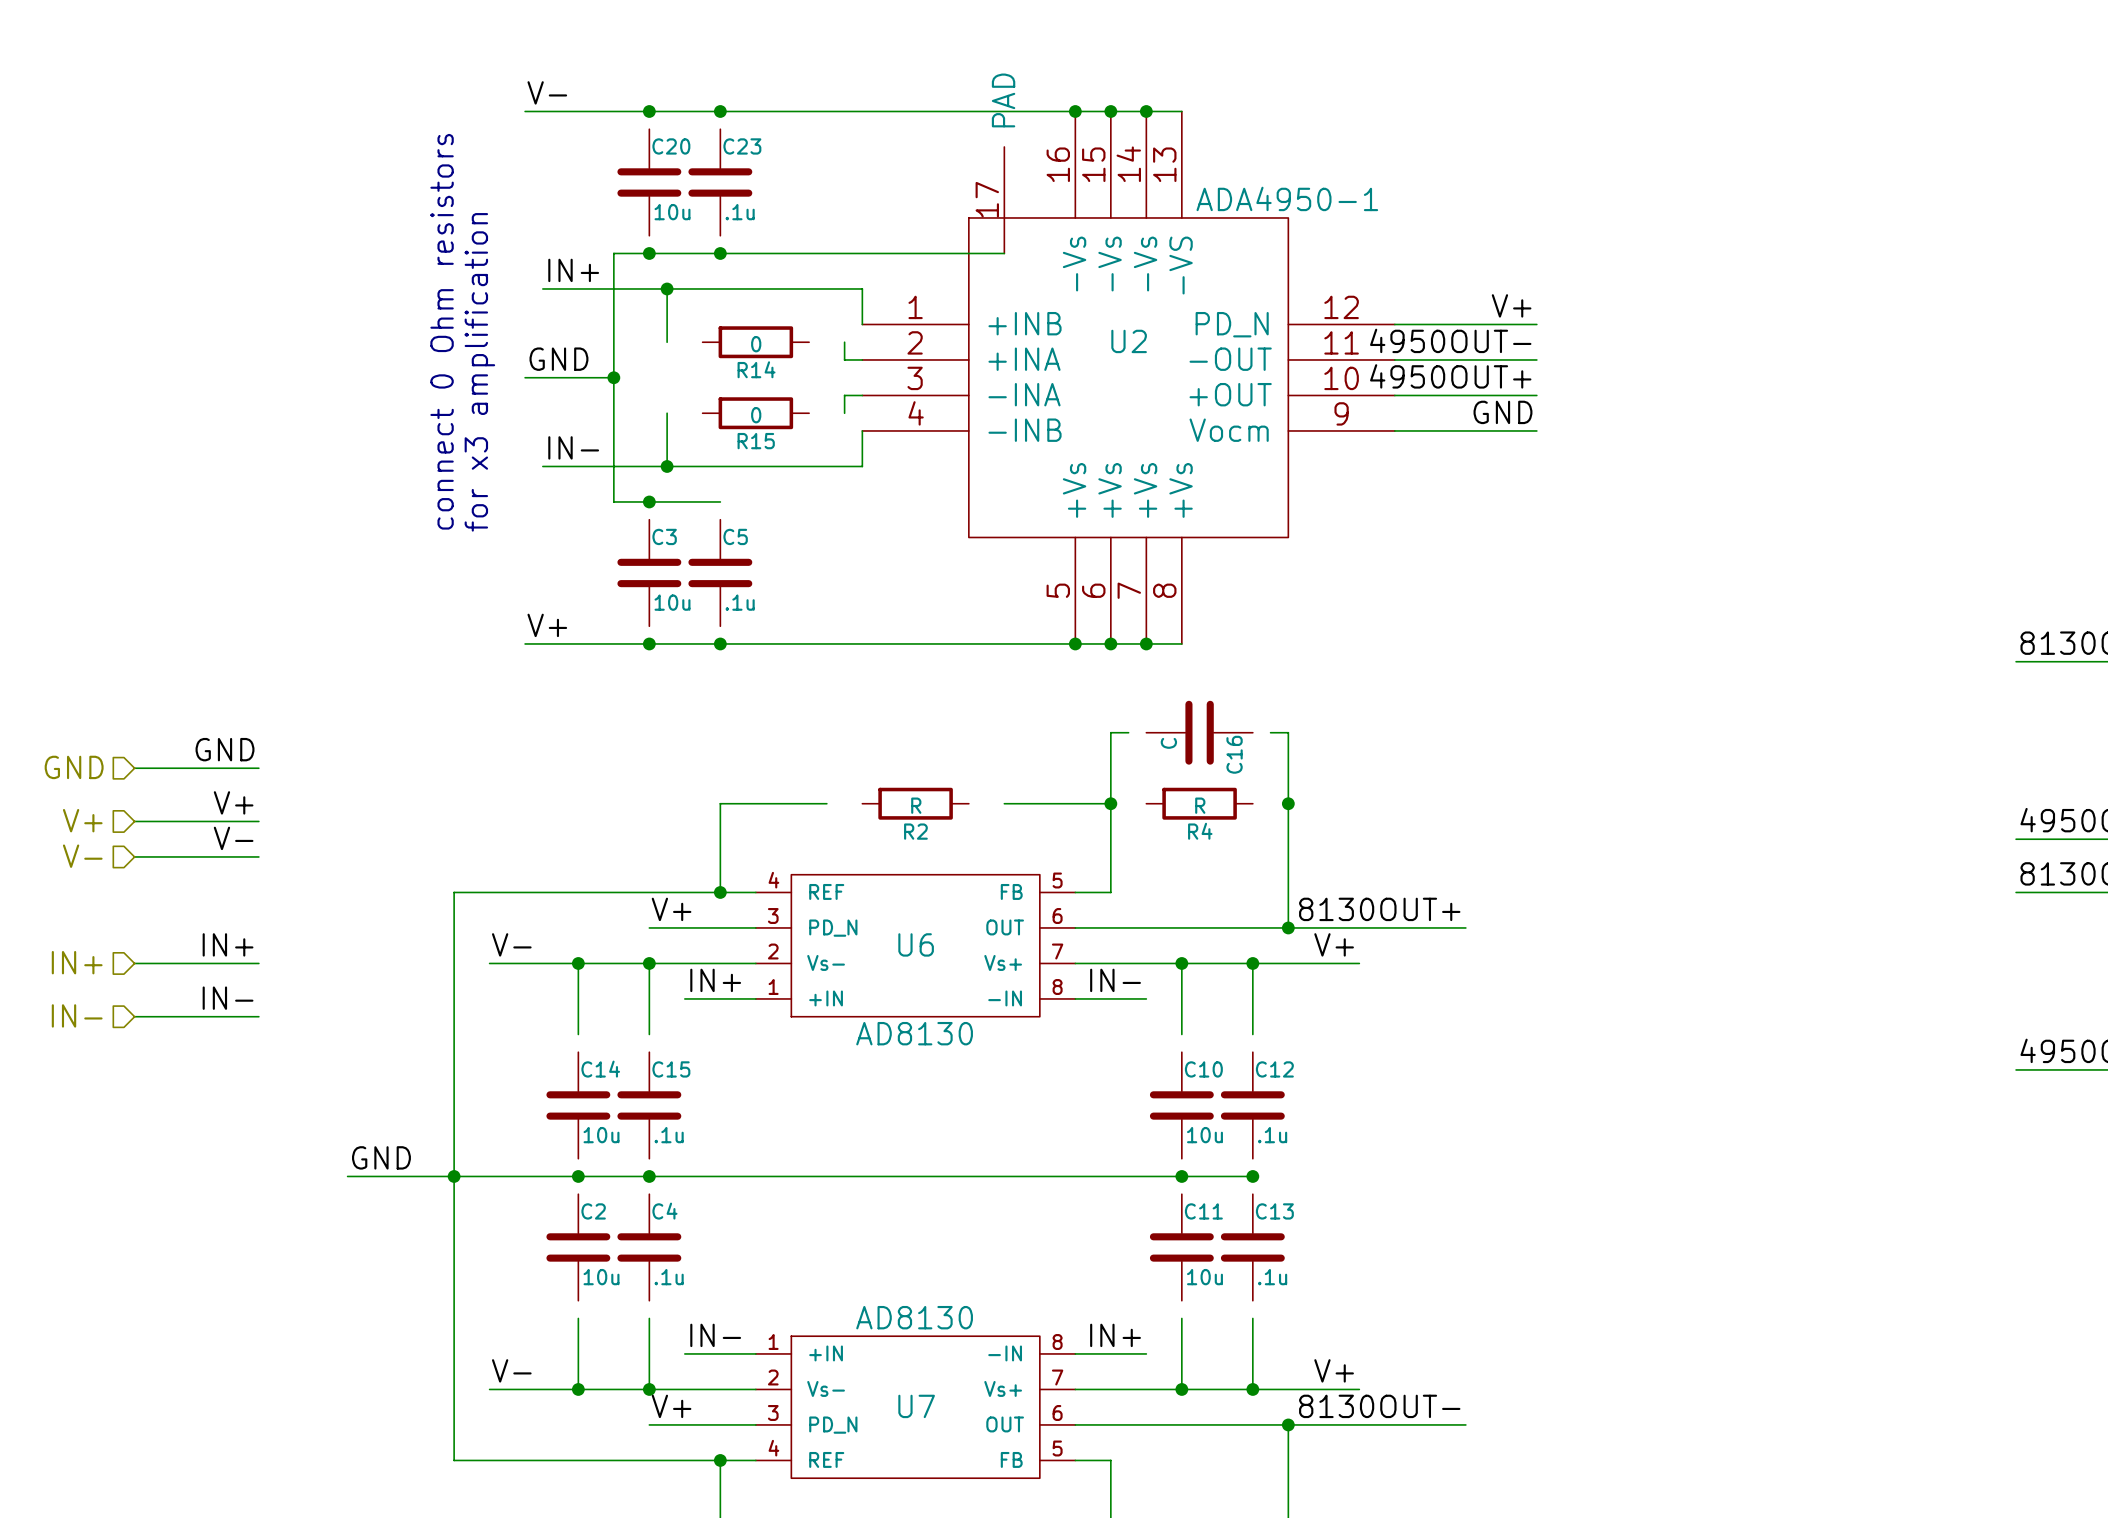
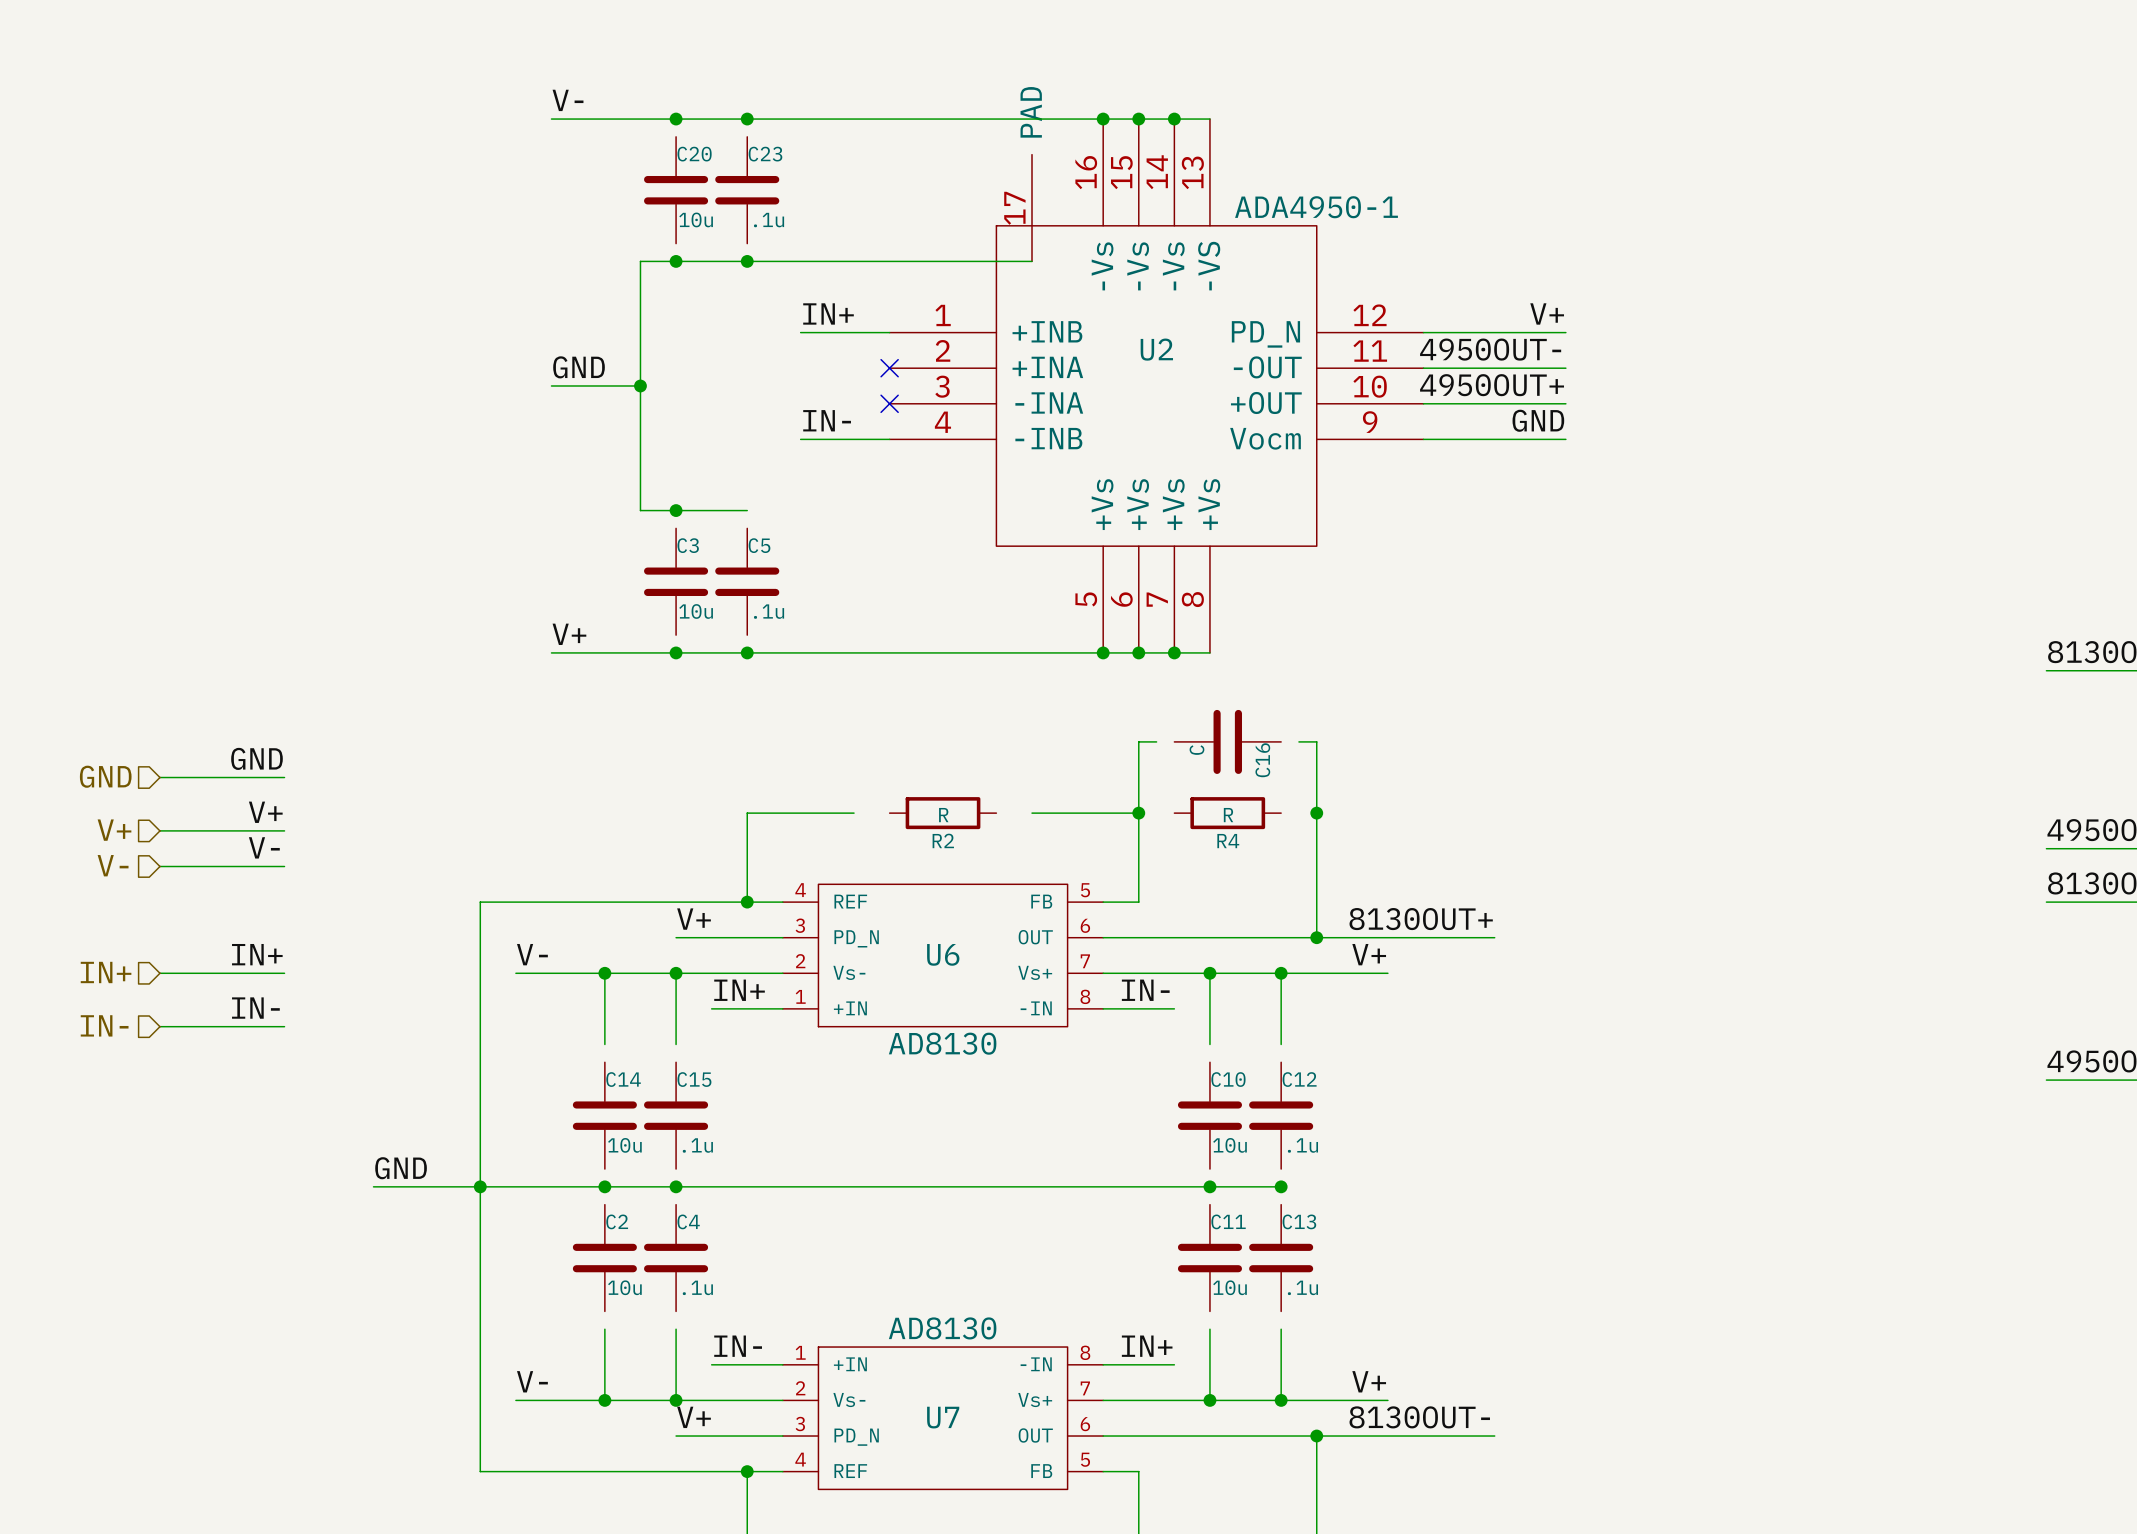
label position: IN+ (573, 270) -> IN+ (828, 313)
wire: (542, 288) (862, 288) (862, 324) -> (800, 332) (889, 332)
wire: (667, 288) (667, 342) -> none
junction: (667, 288) -> none
text: connect 0 Ohm resistors (442, 331) -> none
R14: 0 (755, 342) -> none
wire: (844, 342) (844, 359) (862, 359) -> none
no-connect mark: none -> (889, 368)
text: for x3 amplification (479, 372) -> none
wire: (862, 395) (844, 395) (844, 413) -> none
no-connect mark: none -> (889, 403)
wire: (667, 413) (667, 466) -> none
R15: 0 (755, 413) -> none
wire: (862, 430) (862, 466) (542, 466) -> (889, 439) (800, 439)
label position: IN- (573, 447) -> IN- (827, 420)
junction: (667, 466) -> none

